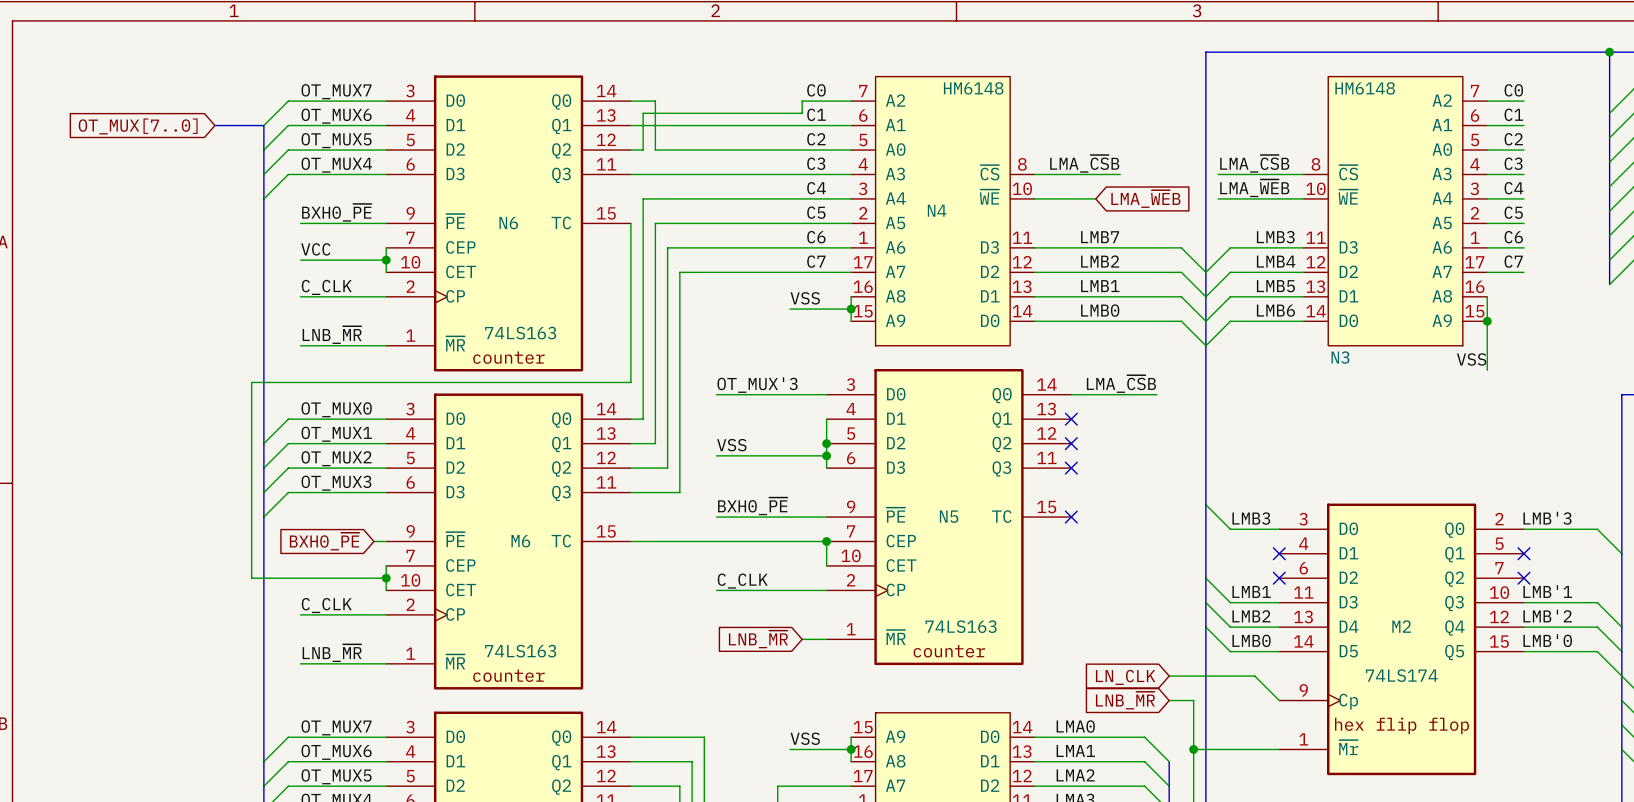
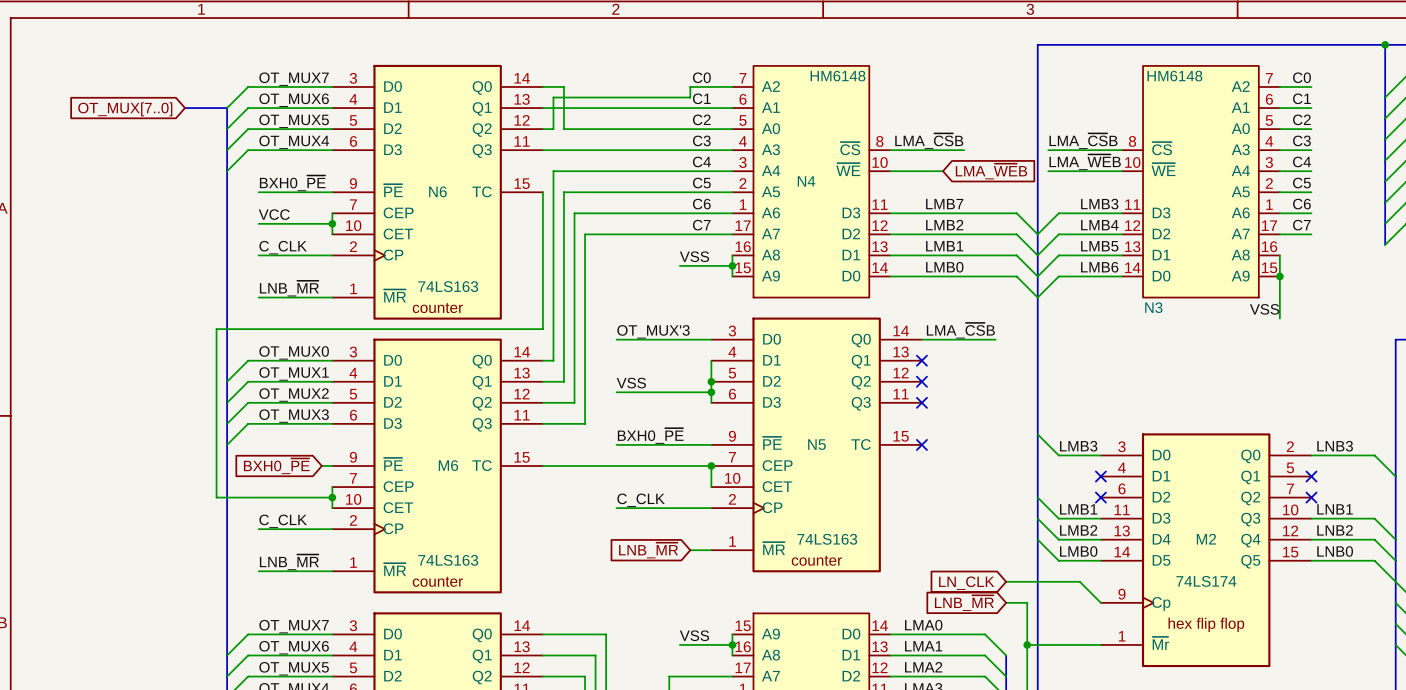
label: LMB'3 (1547, 518) -> LNB3 (1335, 446)
label: LMB'1 (1547, 591) -> LNB1 (1335, 509)
label: LMB'2 (1547, 616) -> LNB2 (1335, 530)
label: LMB'0 (1547, 640) -> LNB0 (1335, 551)

